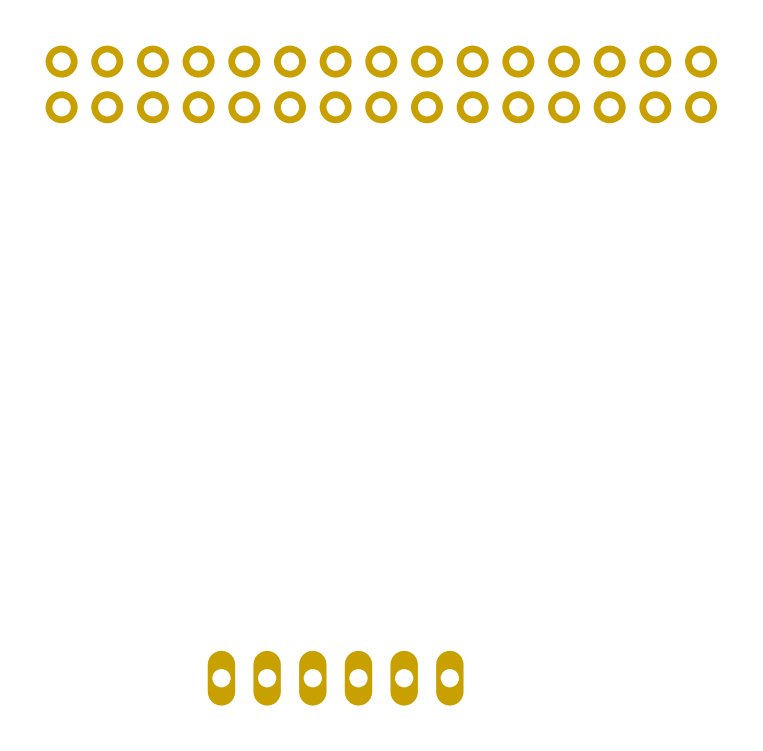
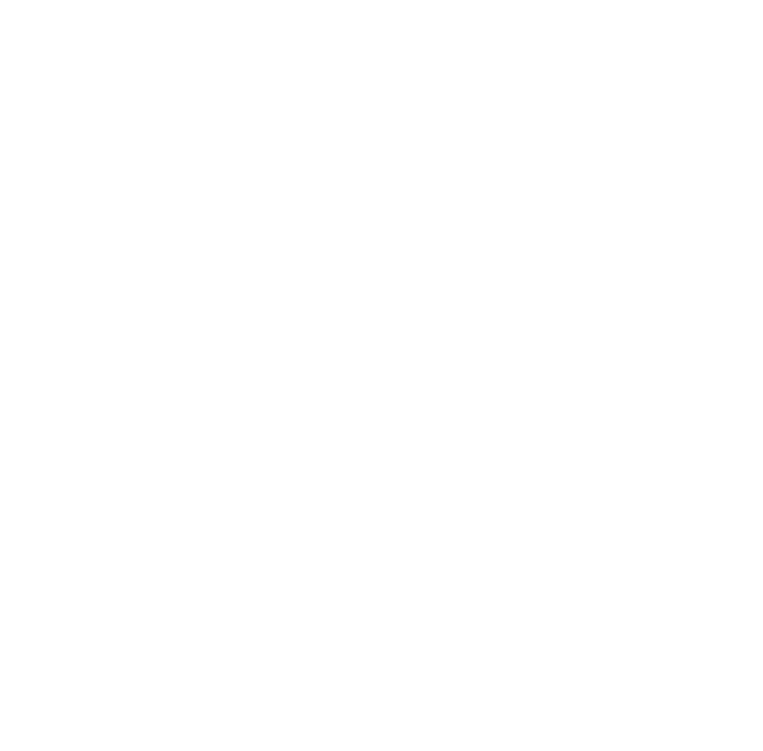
part: (381, 61) -> none
part: (381, 107) -> none
part: (335, 678) -> none

